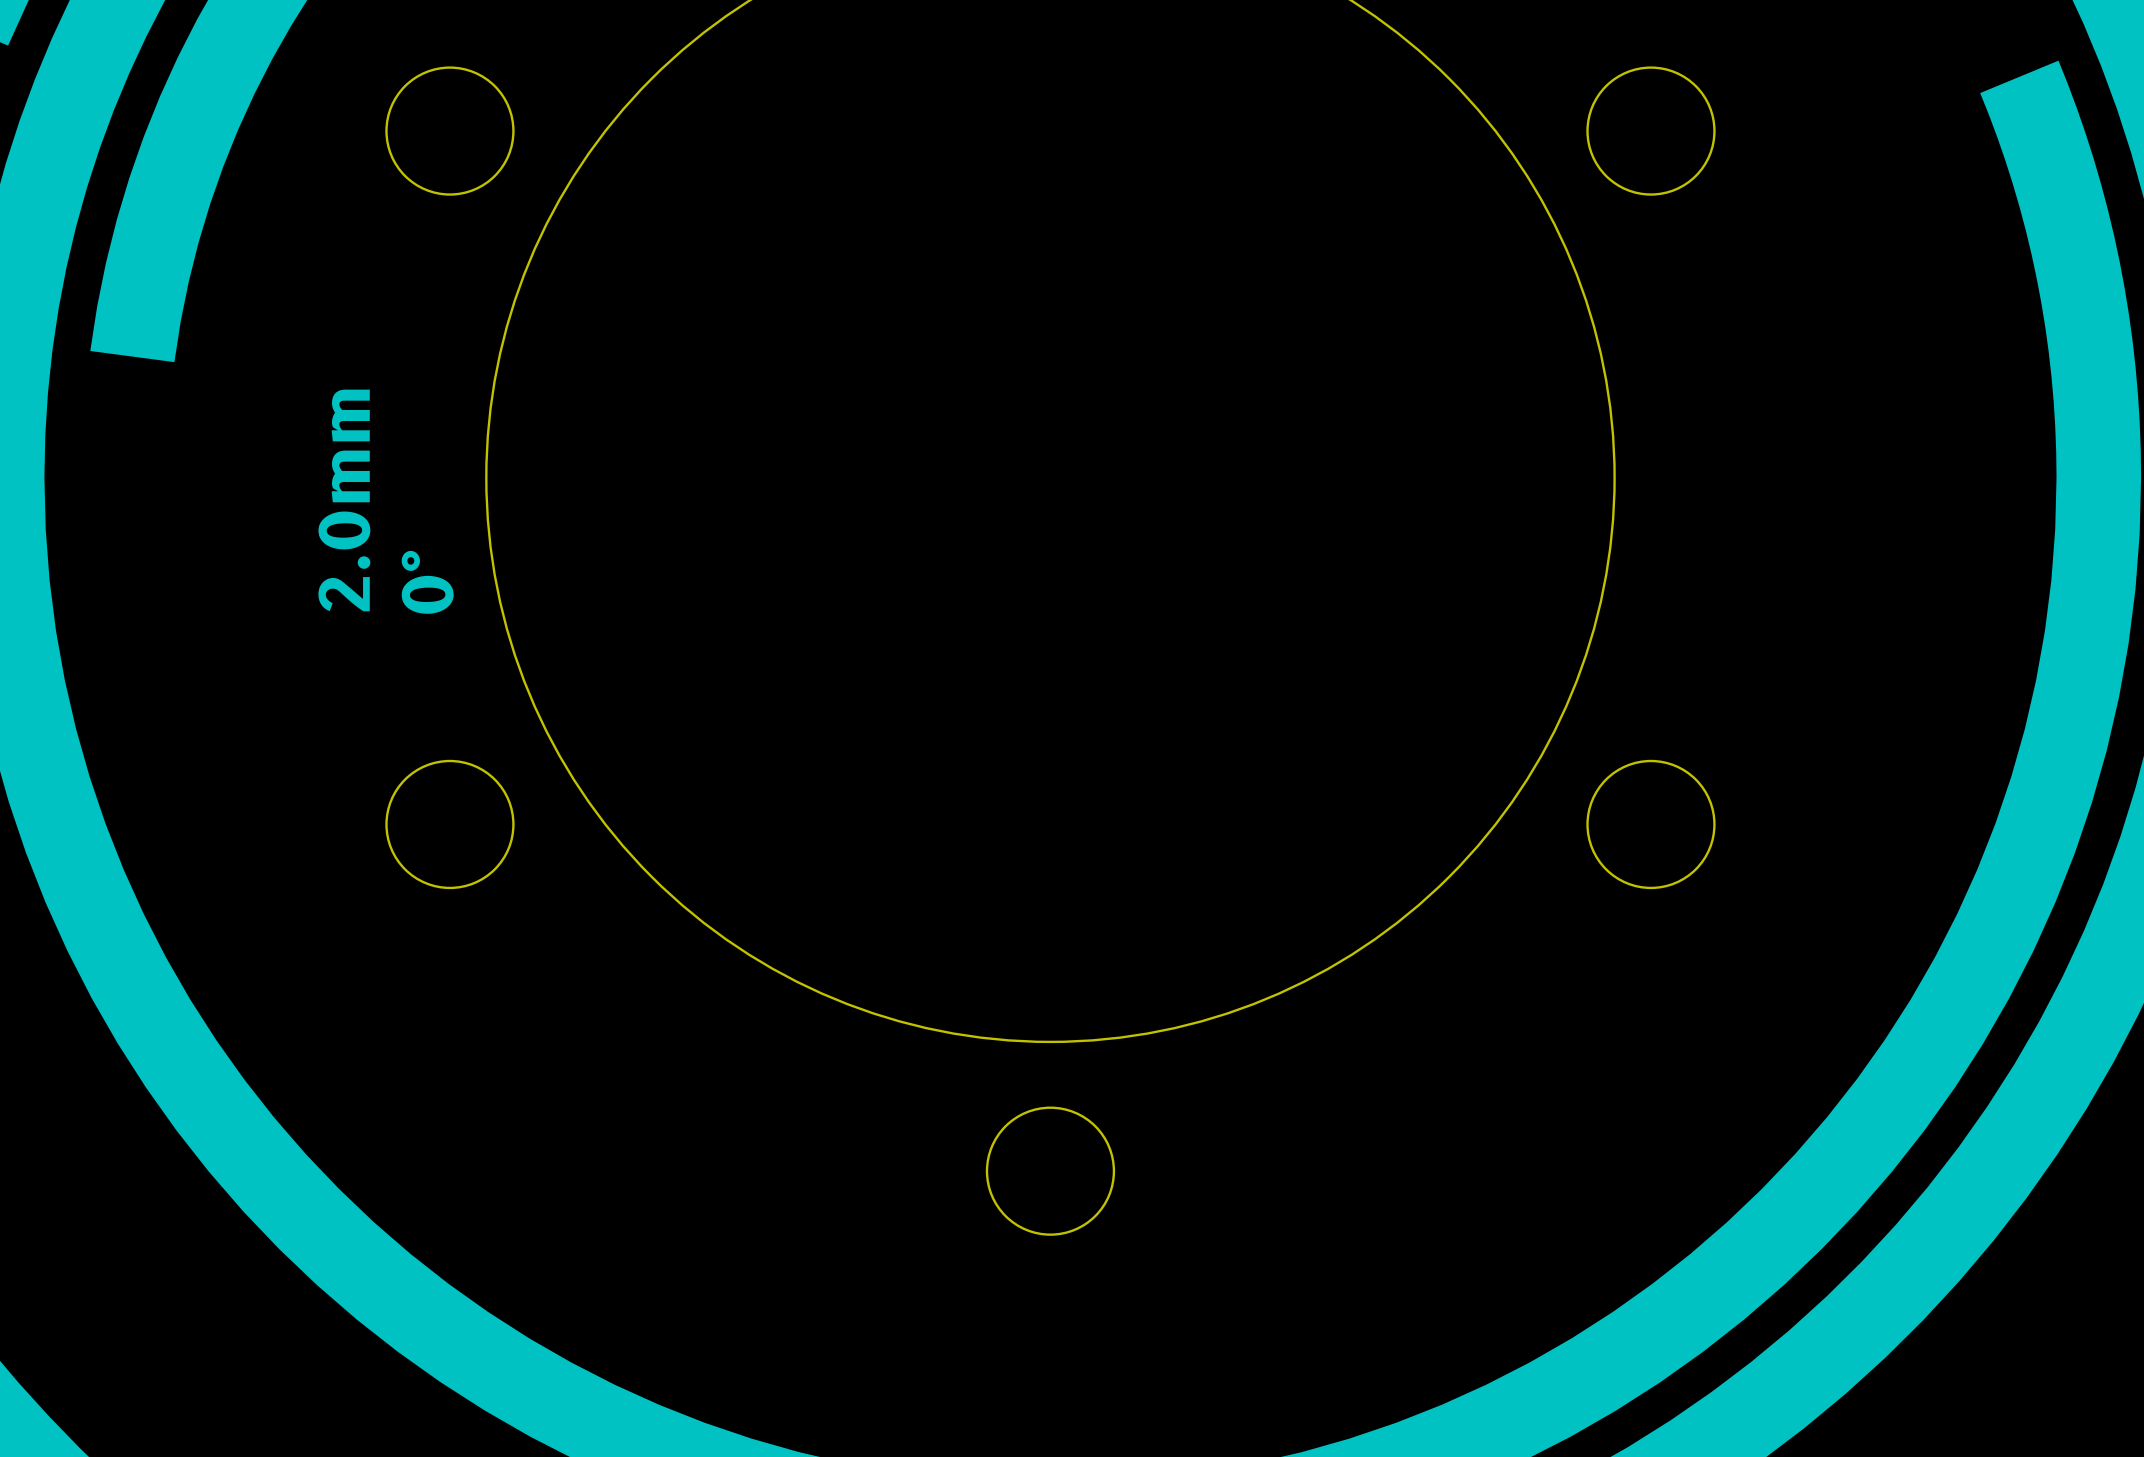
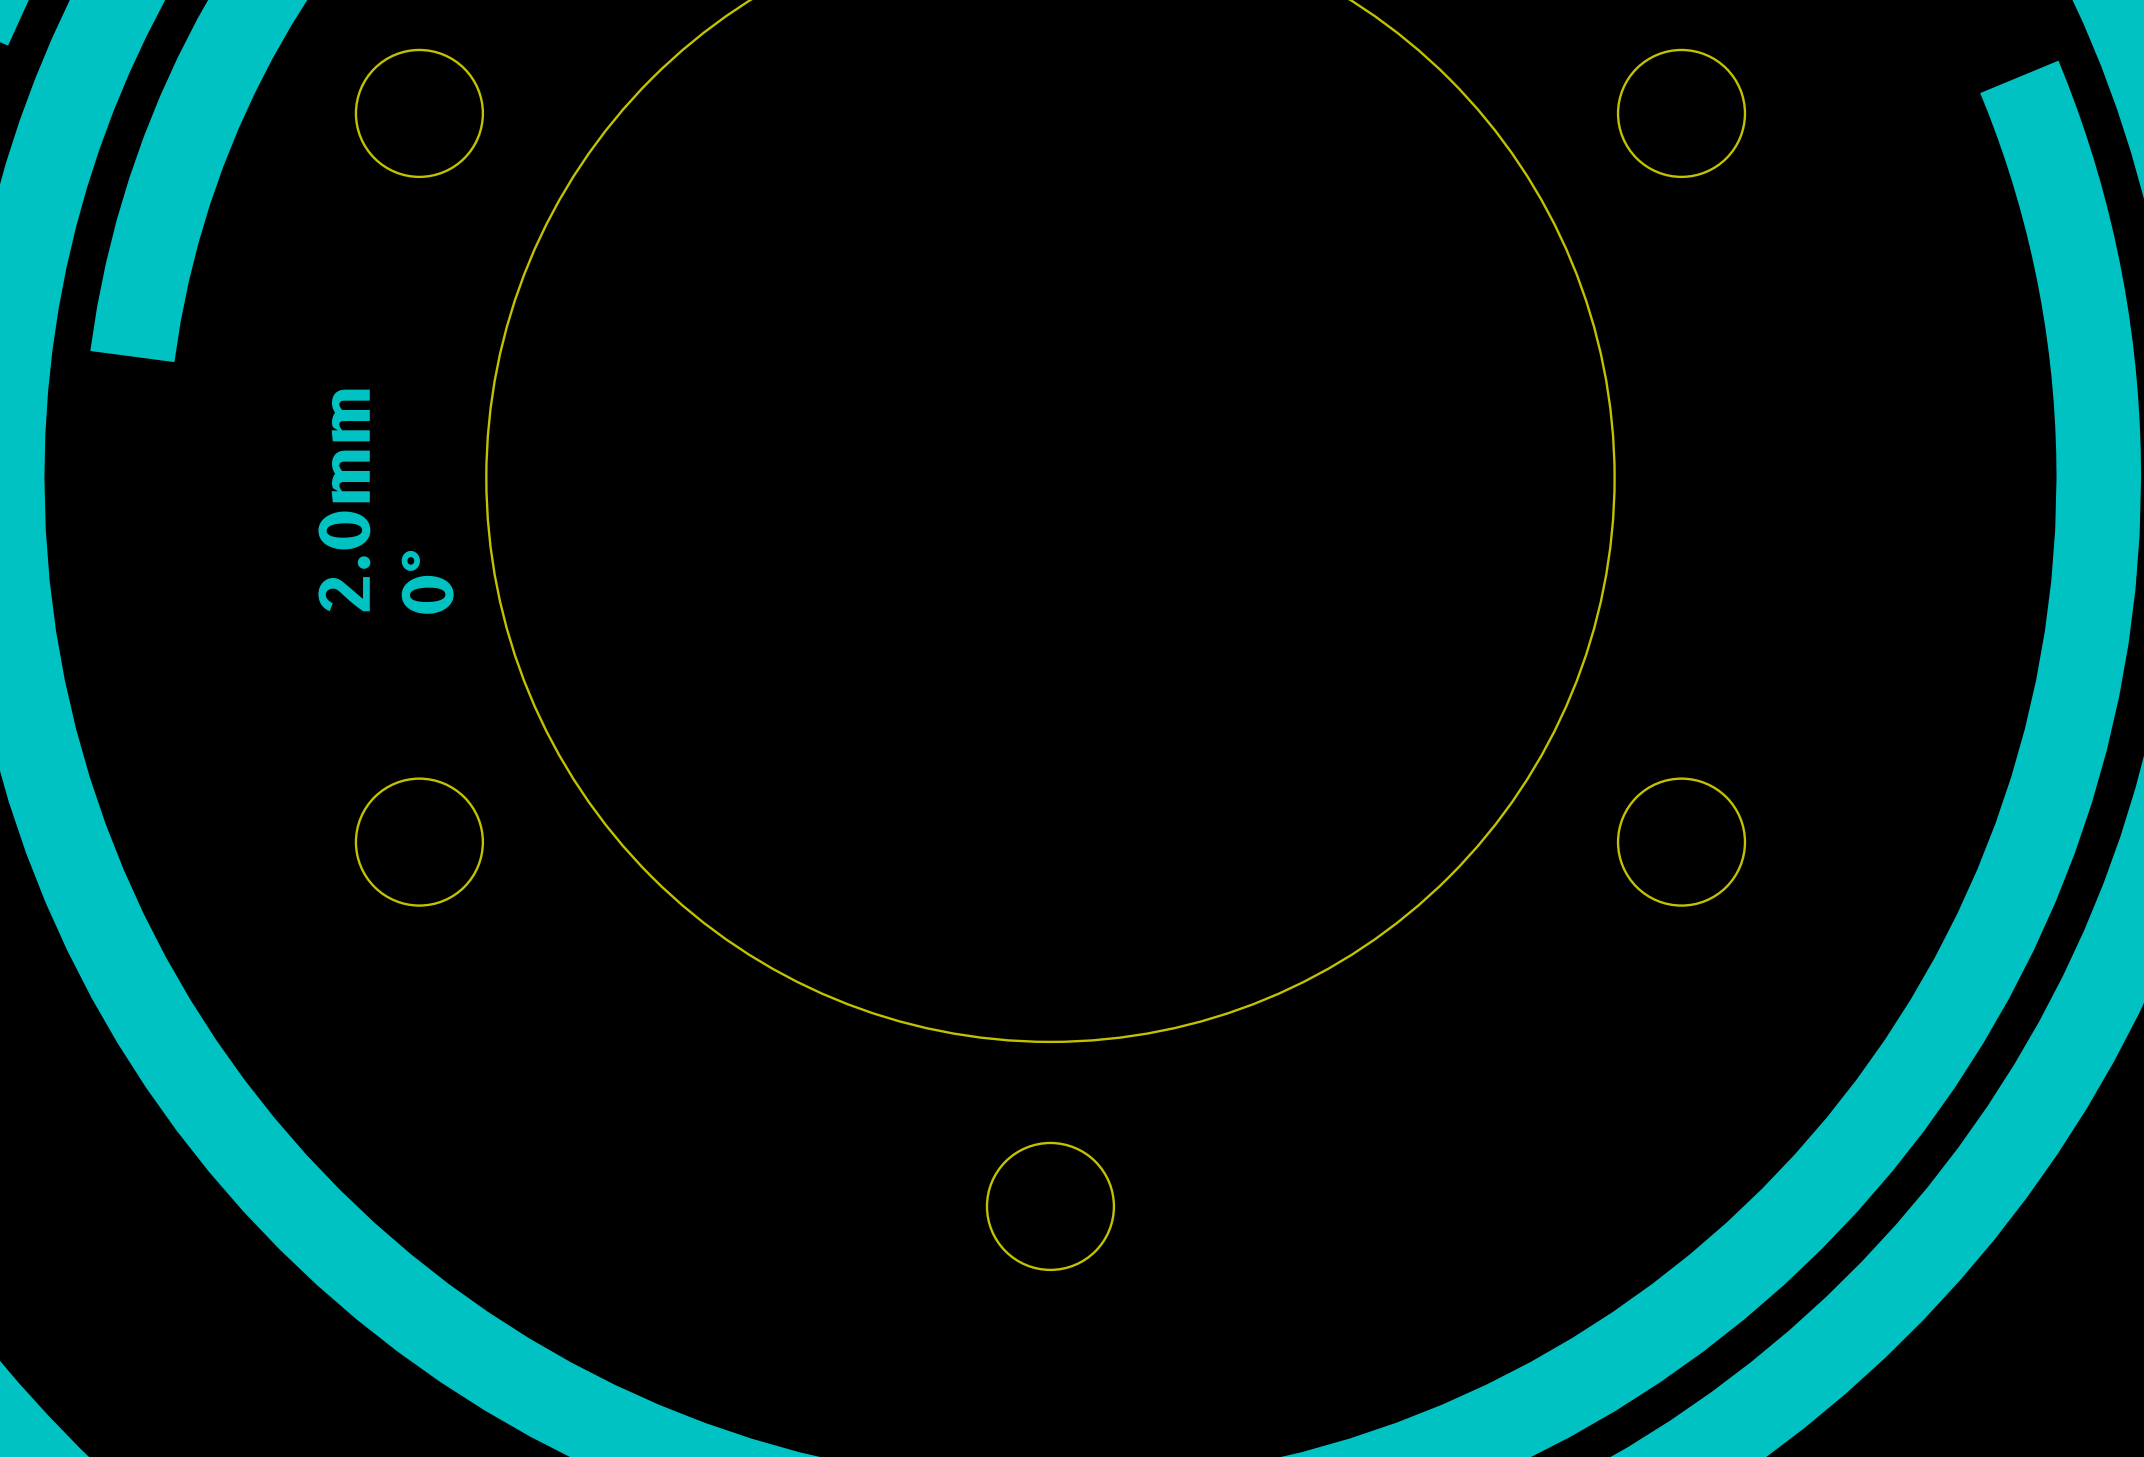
round board edge position: (449, 131) -> (419, 113)
round board edge position: (1650, 131) -> (1681, 113)
round board edge position: (449, 824) -> (419, 842)
round board edge position: (1650, 824) -> (1681, 842)
round board edge position: (1050, 1171) -> (1050, 1206)

